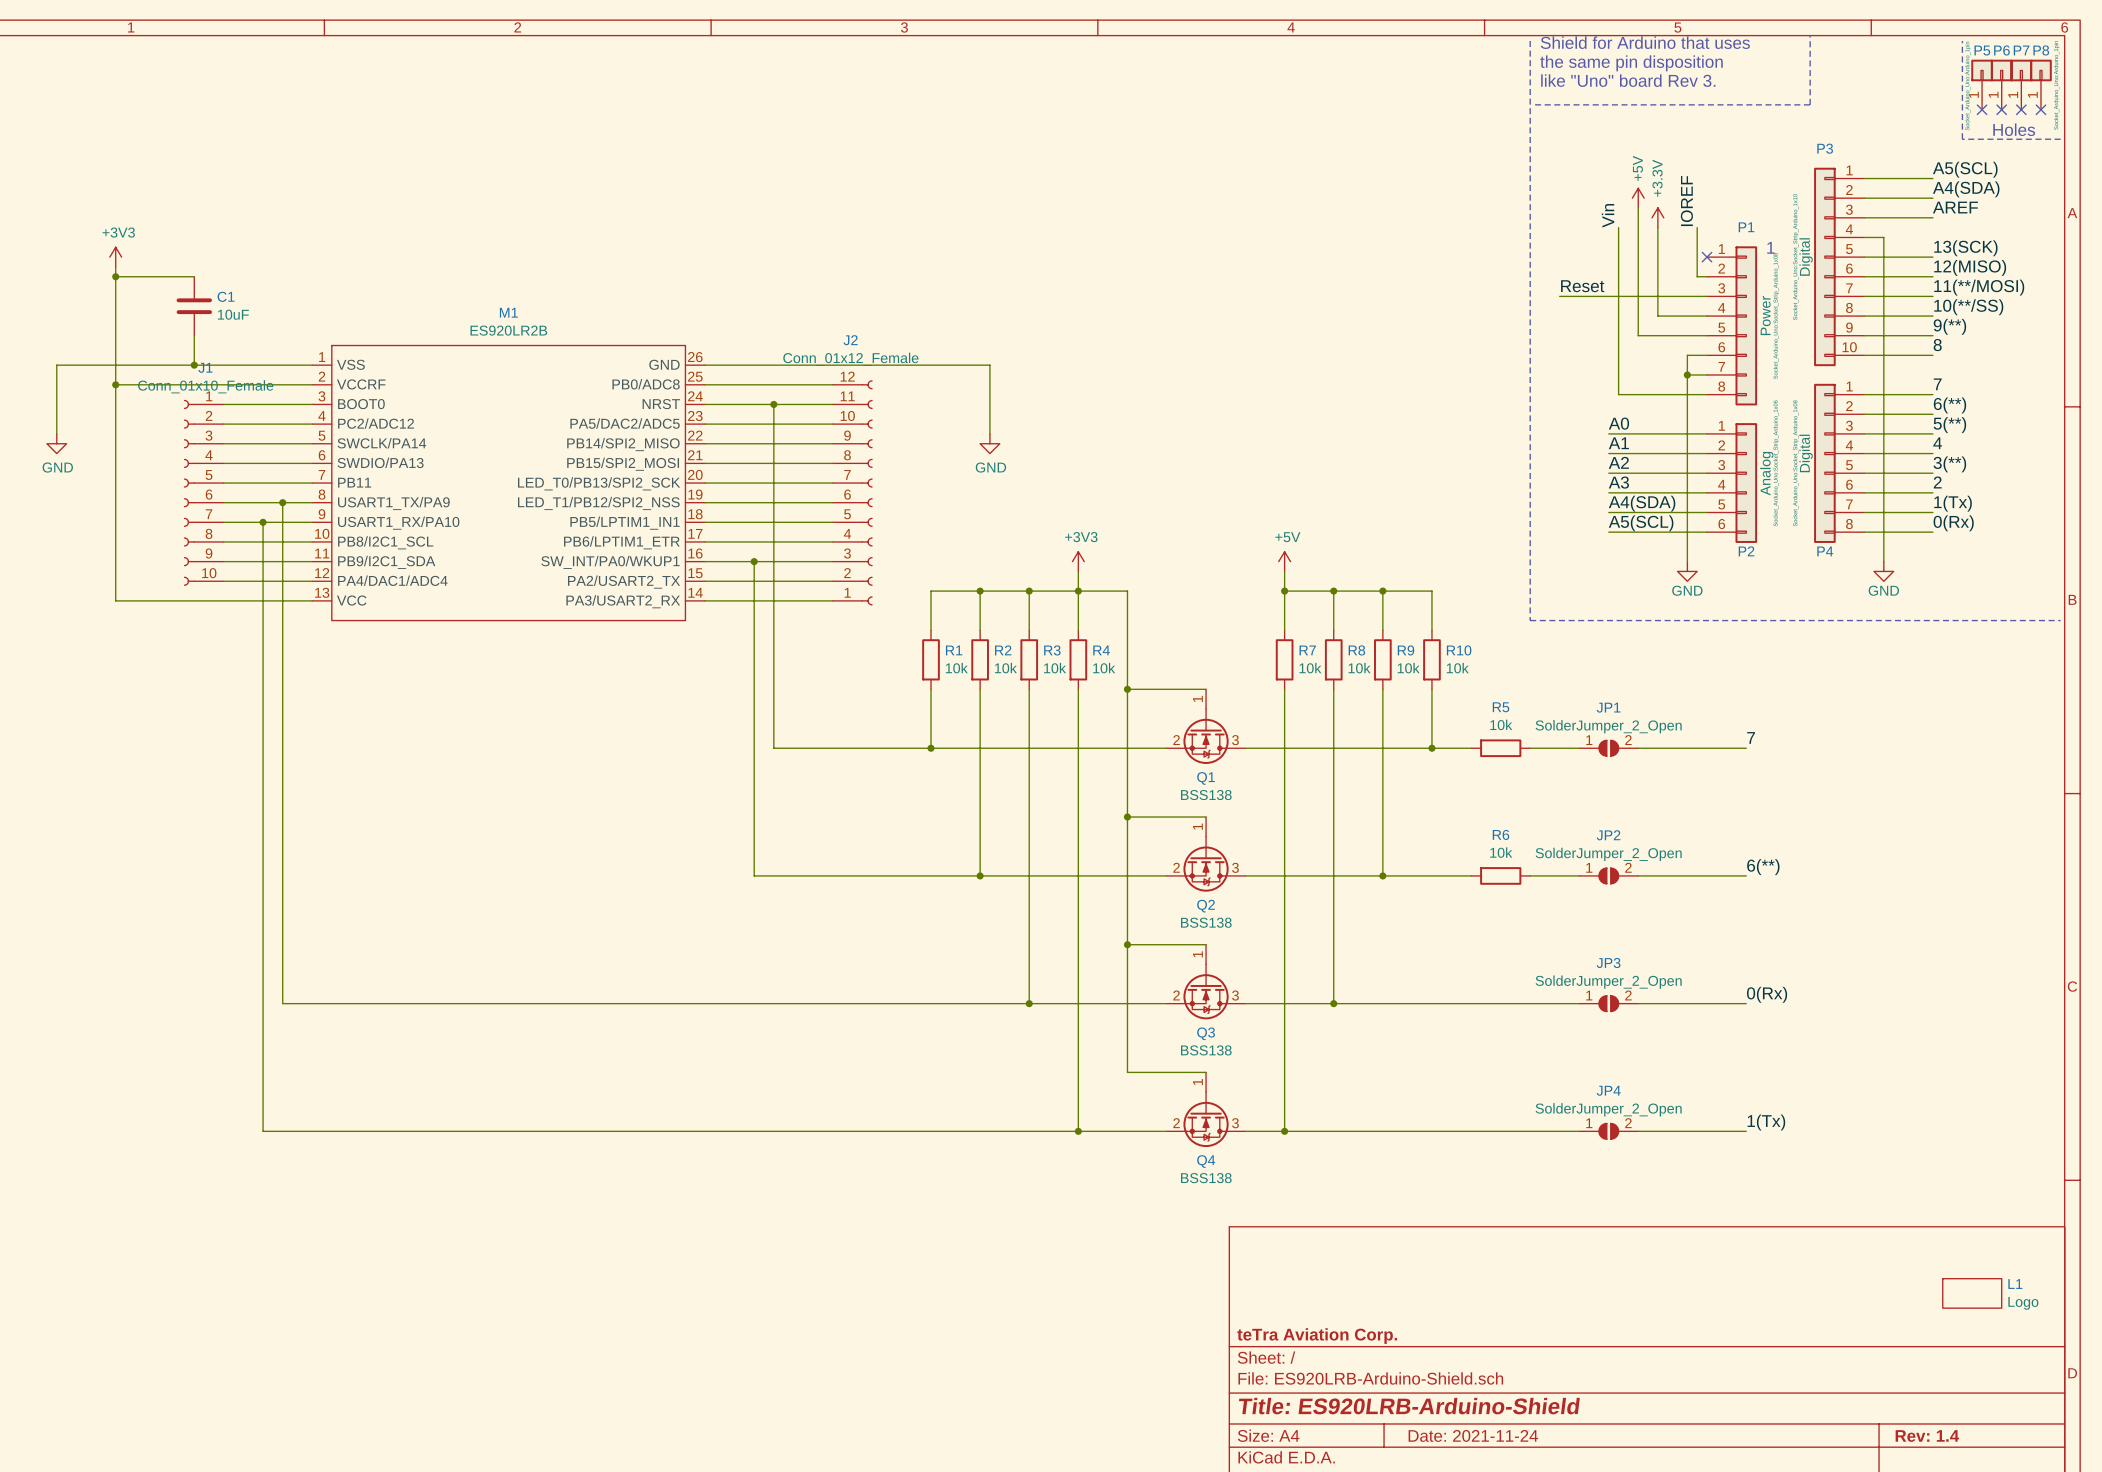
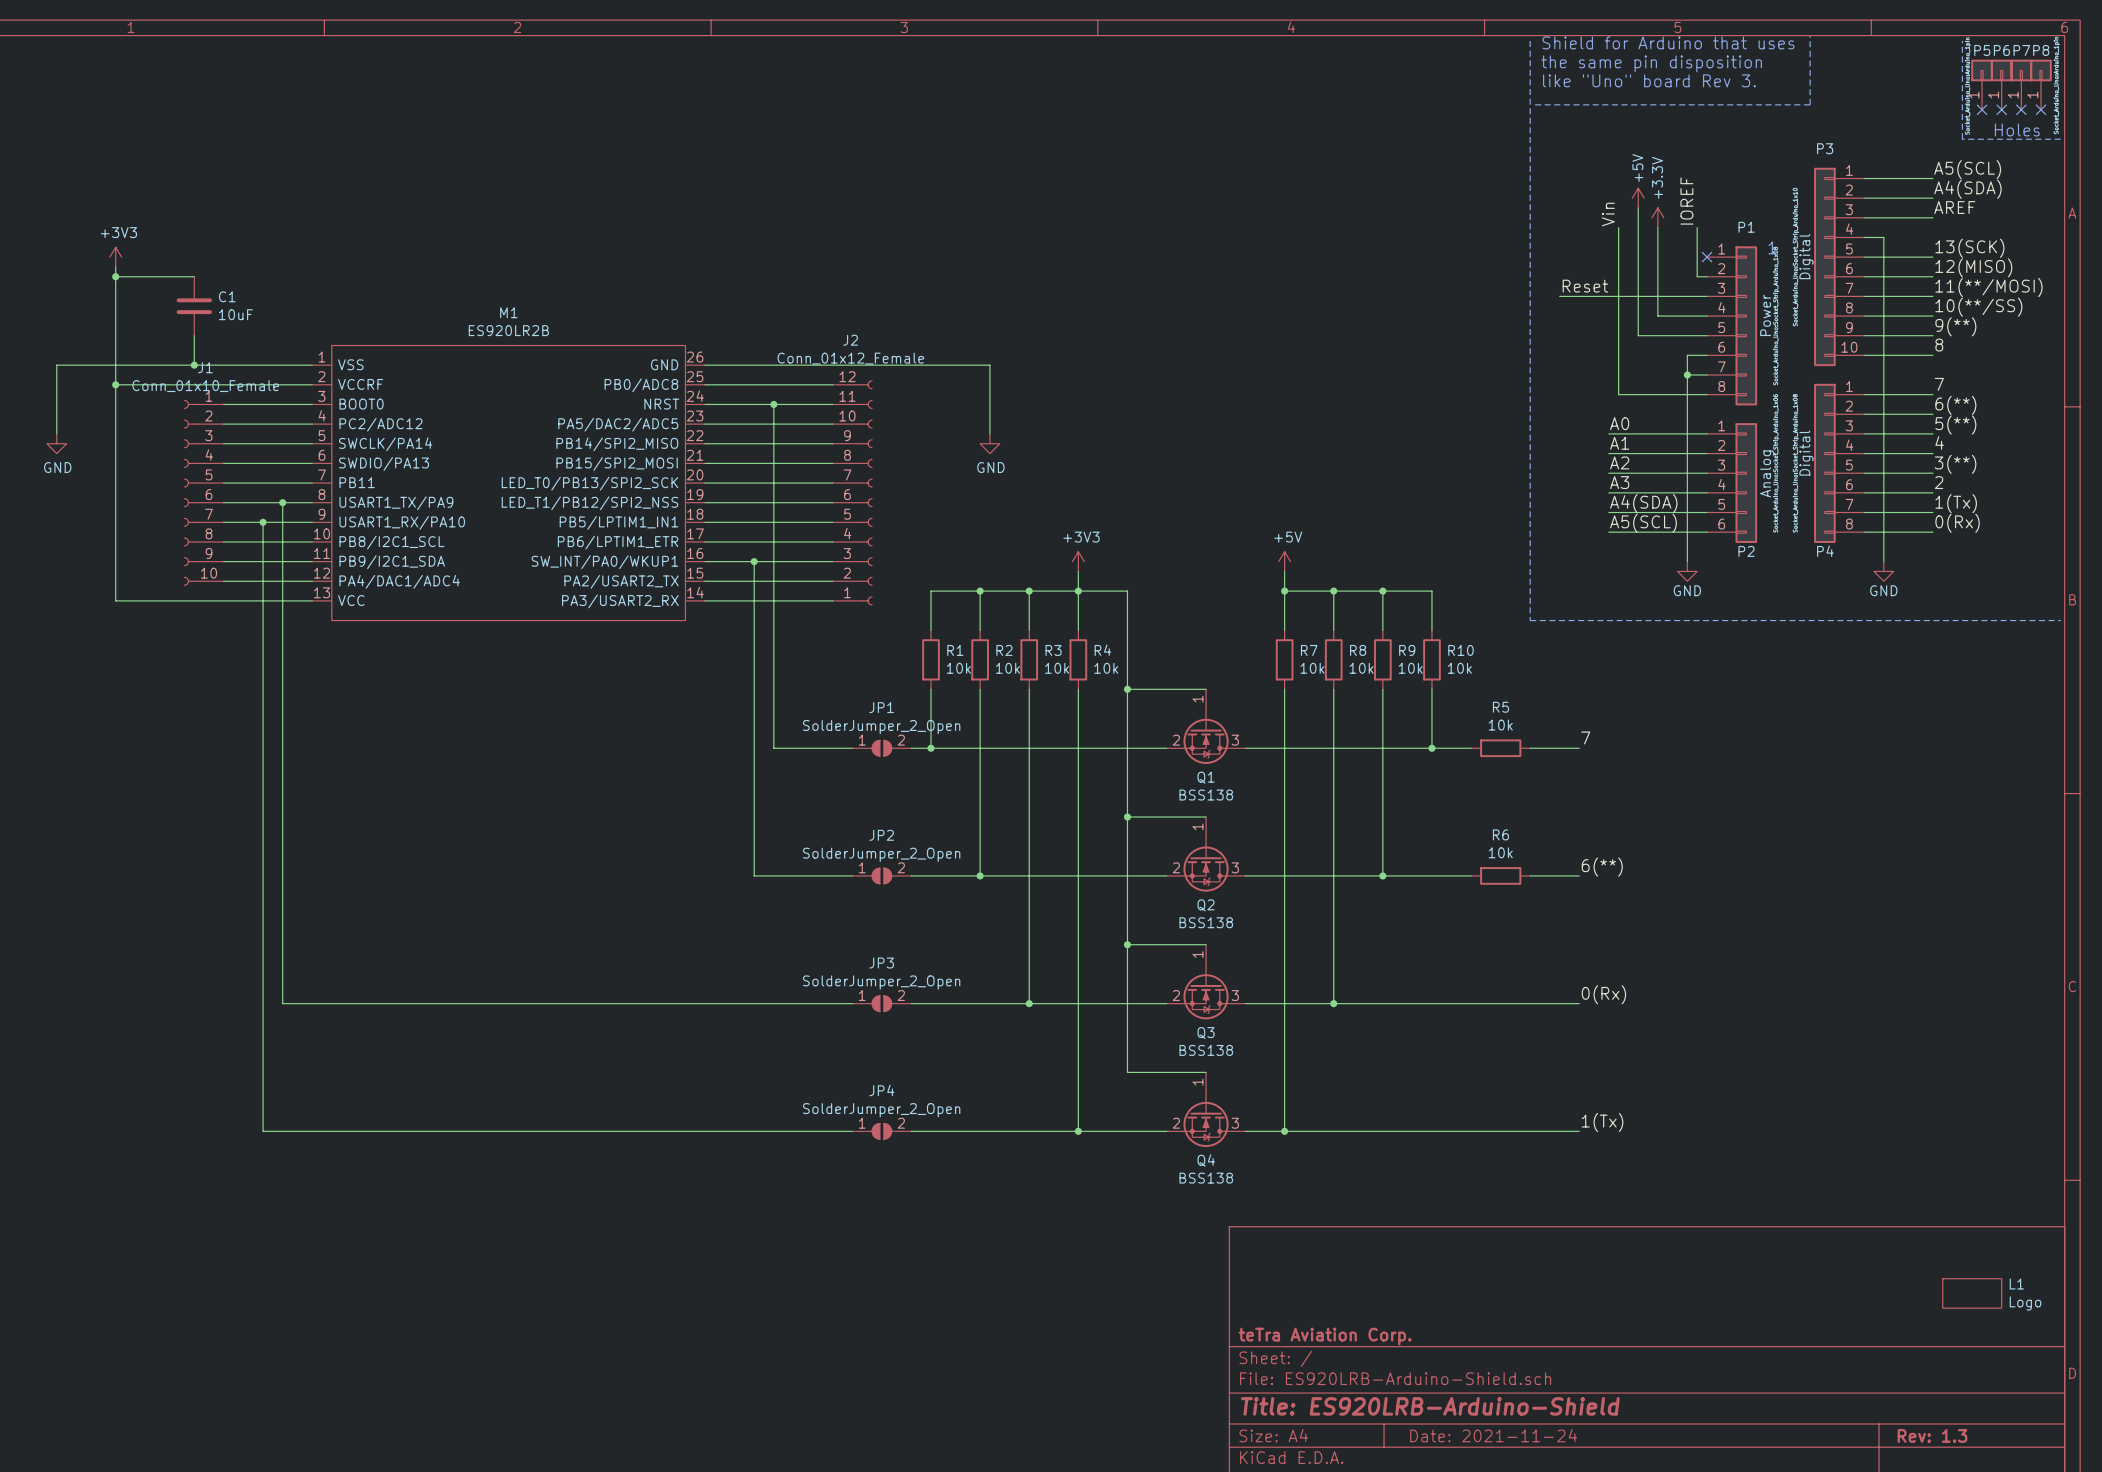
label position: 7 (1751, 737) -> 7 (1585, 737)
JP1 position: (1608, 748) -> (881, 748)
wire: (1638, 748) (1746, 748) -> none
label position: 6(**) (1763, 867) -> 6(**) (1602, 867)
JP2 position: (1608, 875) -> (881, 875)
wire: (1638, 875) (1746, 875) -> none
label position: 0(Rx) (1767, 994) -> 0(Rx) (1603, 994)
JP3 position: (1608, 1003) -> (881, 1003)
wire: (1638, 1003) (1746, 1003) -> none
label position: 1(Tx) (1766, 1122) -> 1(Tx) (1602, 1122)
JP4 position: (1608, 1131) -> (881, 1131)
wire: (1638, 1131) (1746, 1131) -> none
title block: Rev: 1.4 (1927, 1436) -> Rev: 1.3 (1932, 1435)

